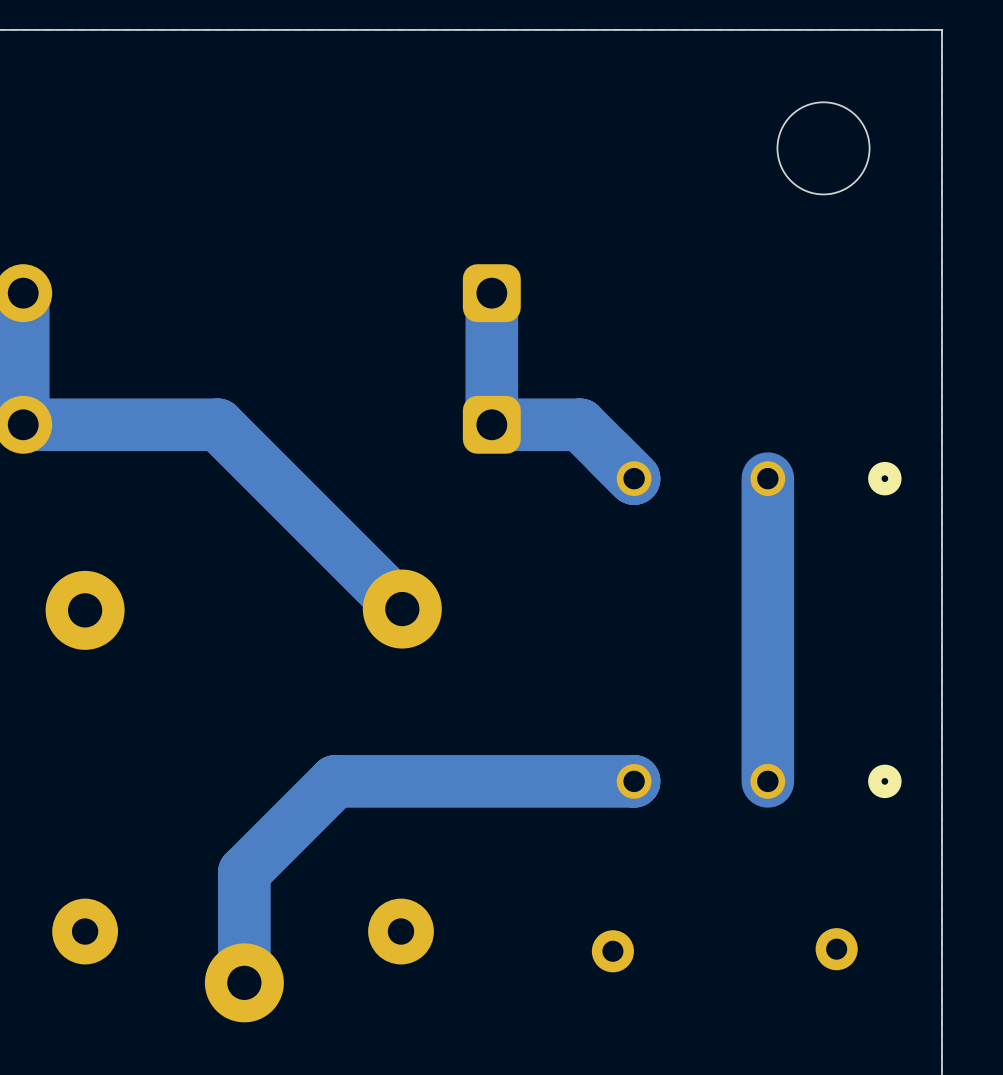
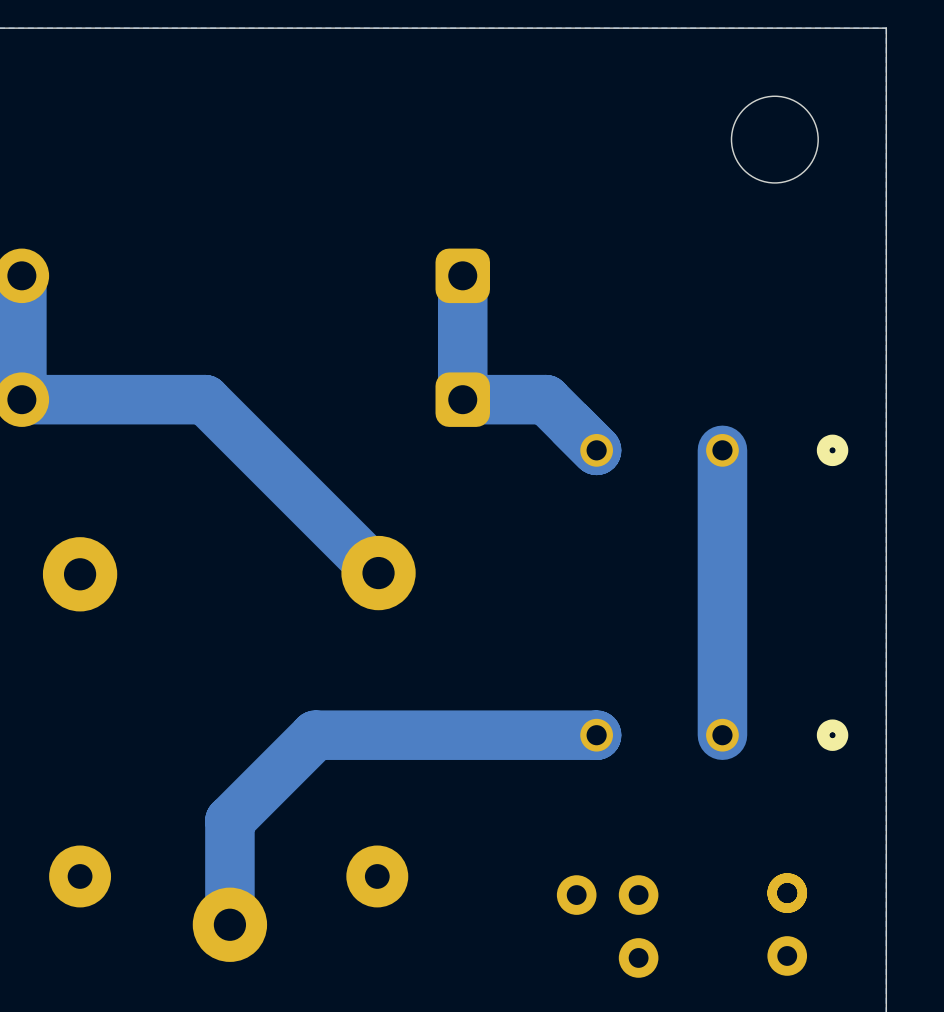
part: none -> (787, 924)
part: none -> (638, 926)

